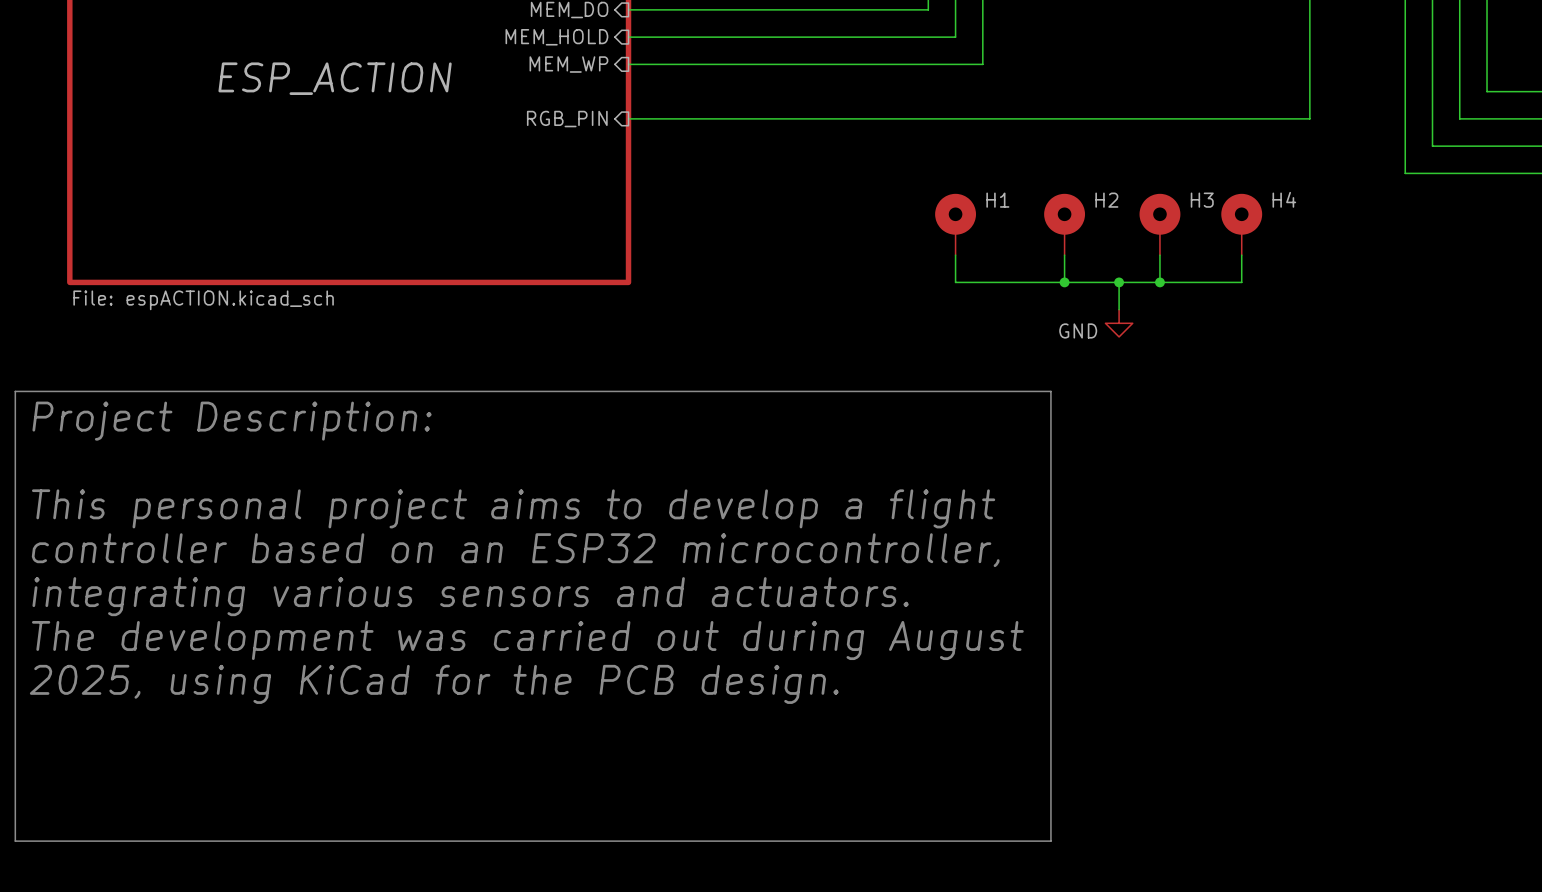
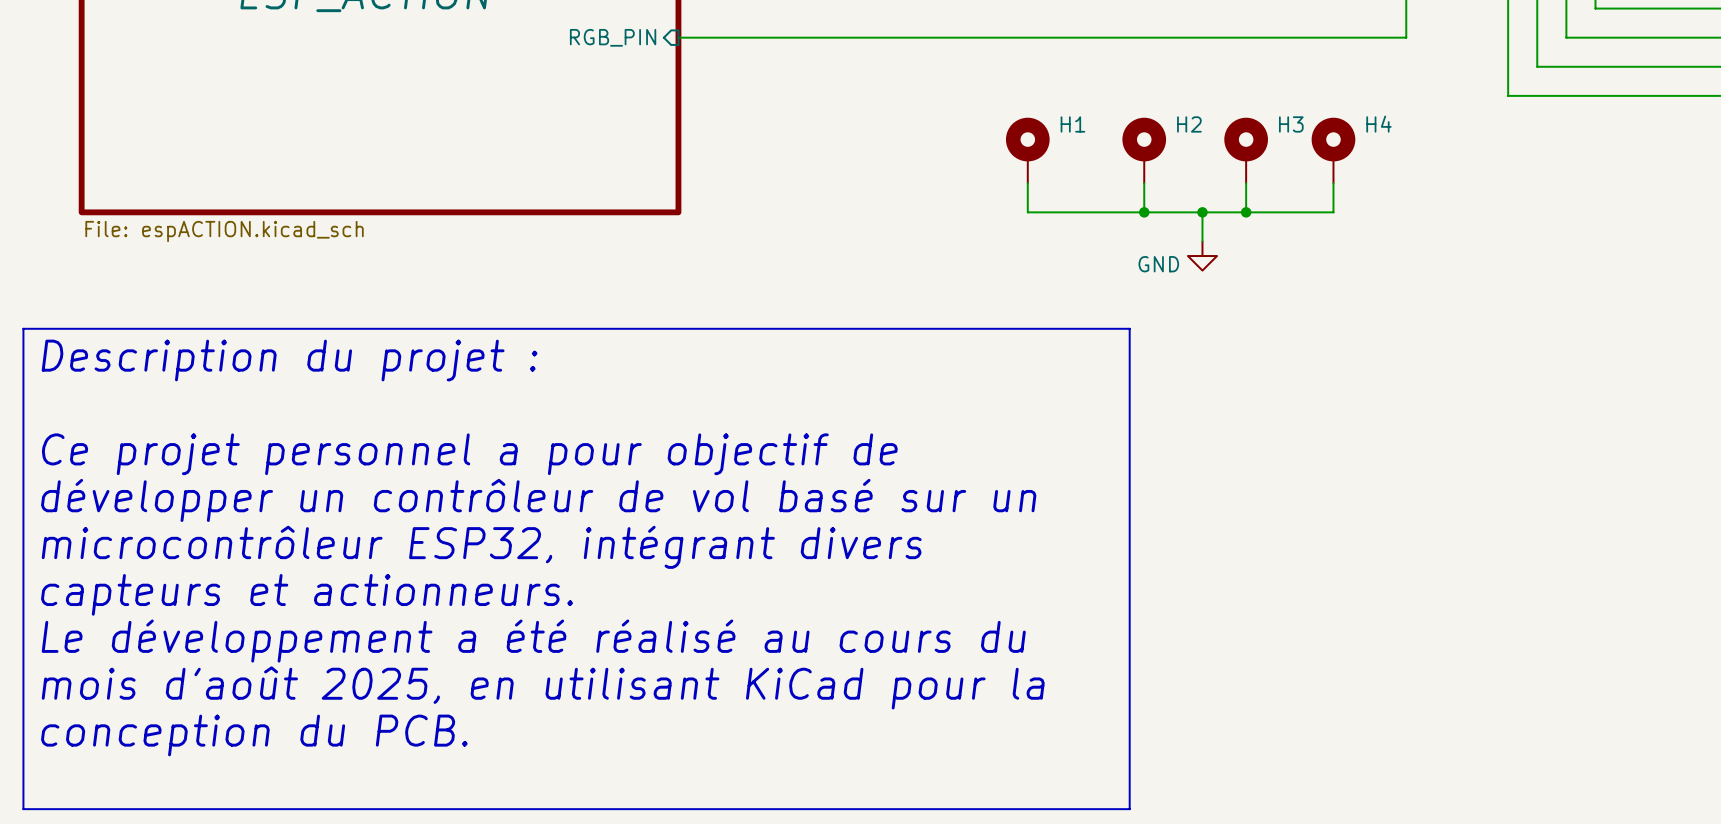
text: Project Description: (232, 421) -> Description du projet : (289, 360)
text: This personal project aims to develop a flight (513, 508) -> Ce projet personnel a pour objectif de (469, 454)
text: controller based on an ESP32 microcontroller, (515, 550) -> développer un contrôleur de vol basé sur un (538, 500)
text: integrating various sensors and actuators. (470, 596) -> microcontrôleur ESP32, intégrant divers (481, 547)
text: The development was carried out during August (527, 640) -> capteurs et actionneurs. (307, 594)
text: 2025, using KiCad for the PCB design. (434, 684) -> Le développement a été réalisé au cours du (533, 641)
text: none -> mois d'août 2025, en utilisant KiCad pour la (543, 687)
text: none -> conception du PCB. (254, 735)

